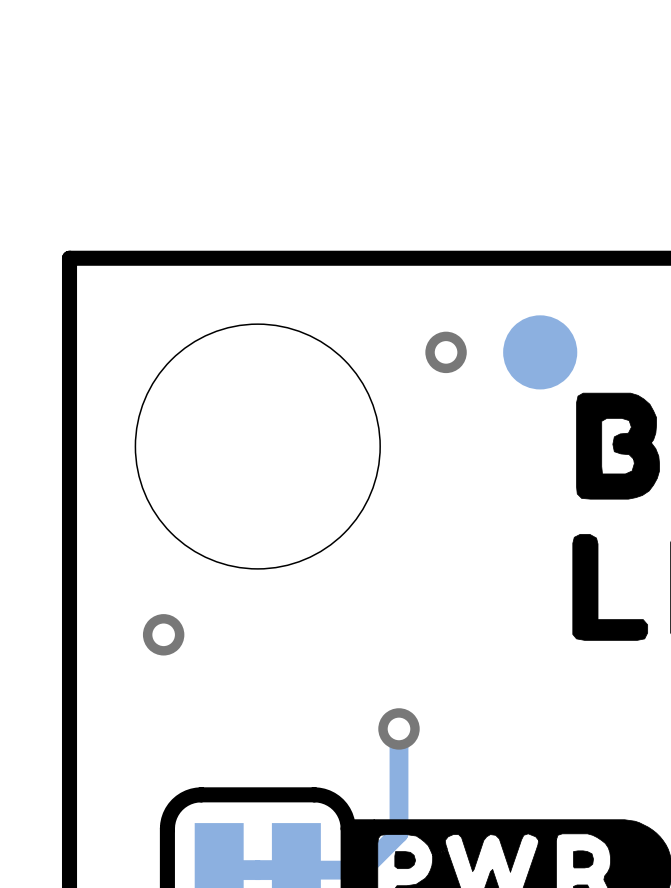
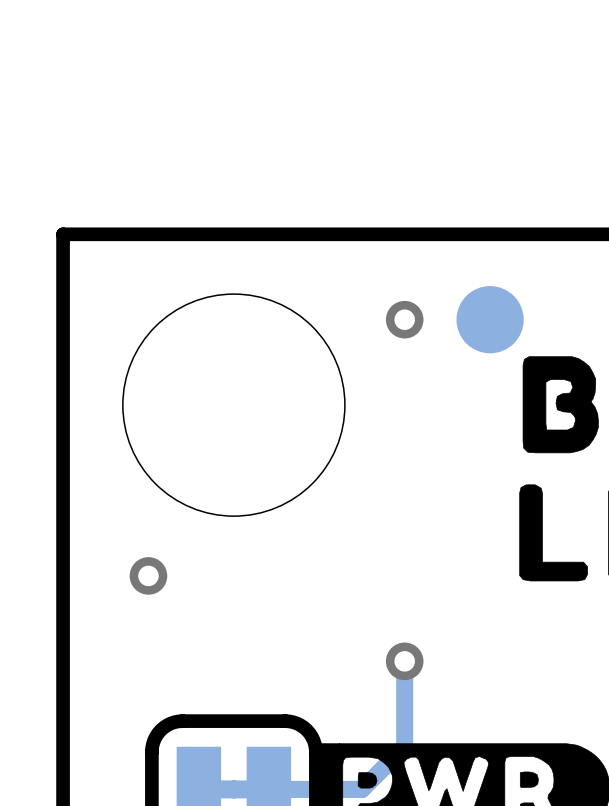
track: (398, 728) (398, 833) (362, 870) -> (404, 661) (404, 746) (361, 789) (328, 789)
via position: (398, 728) -> (404, 661)

